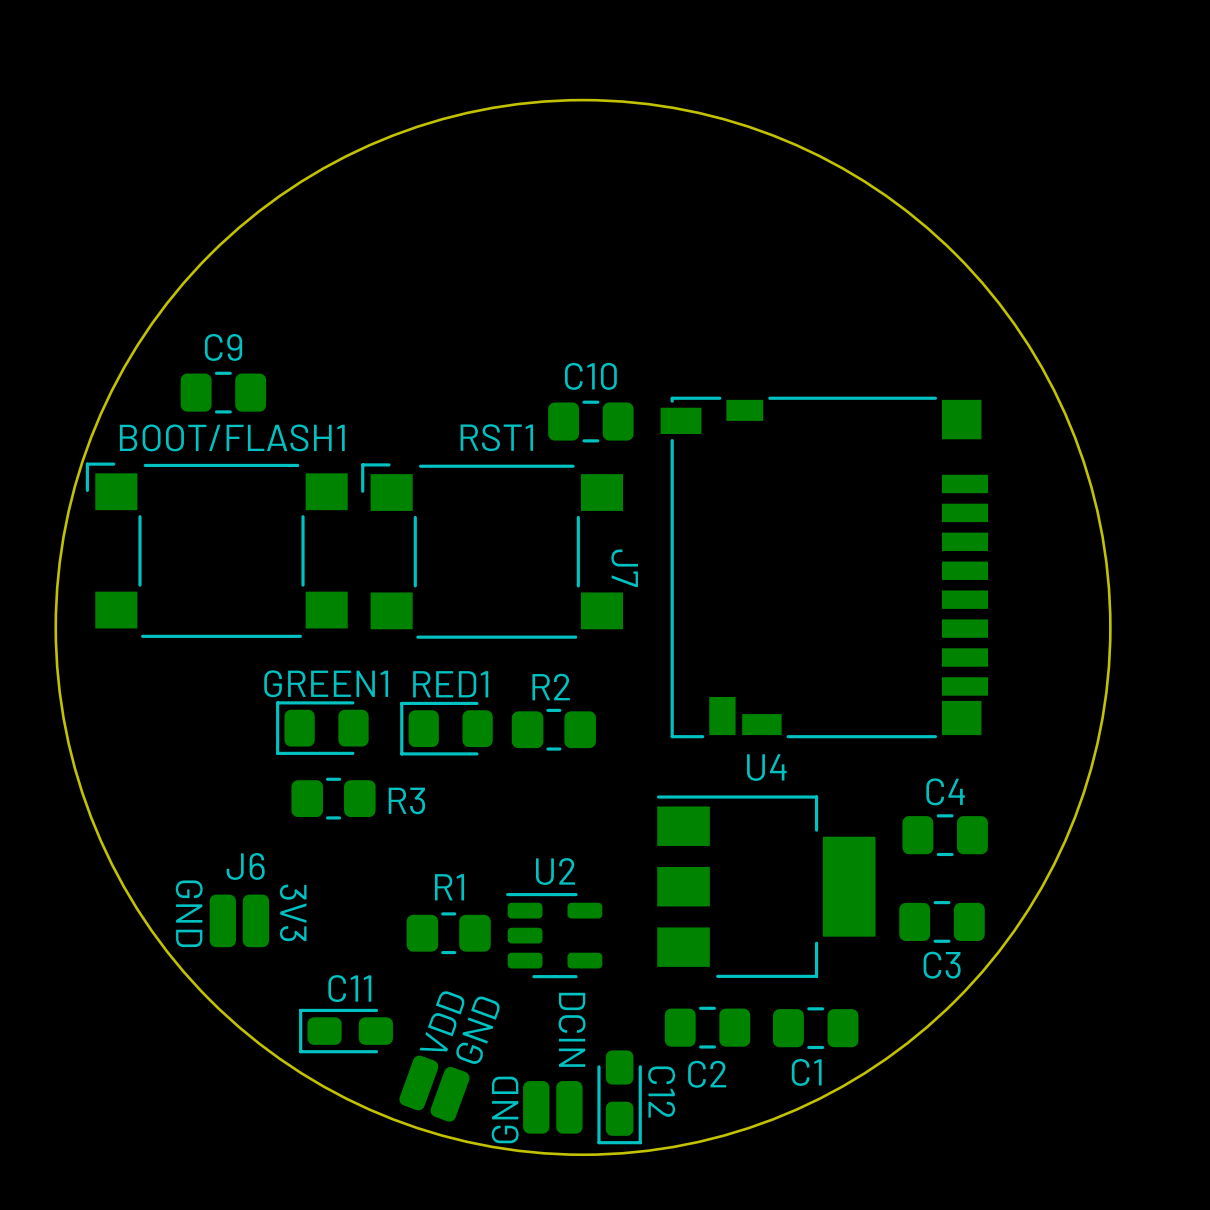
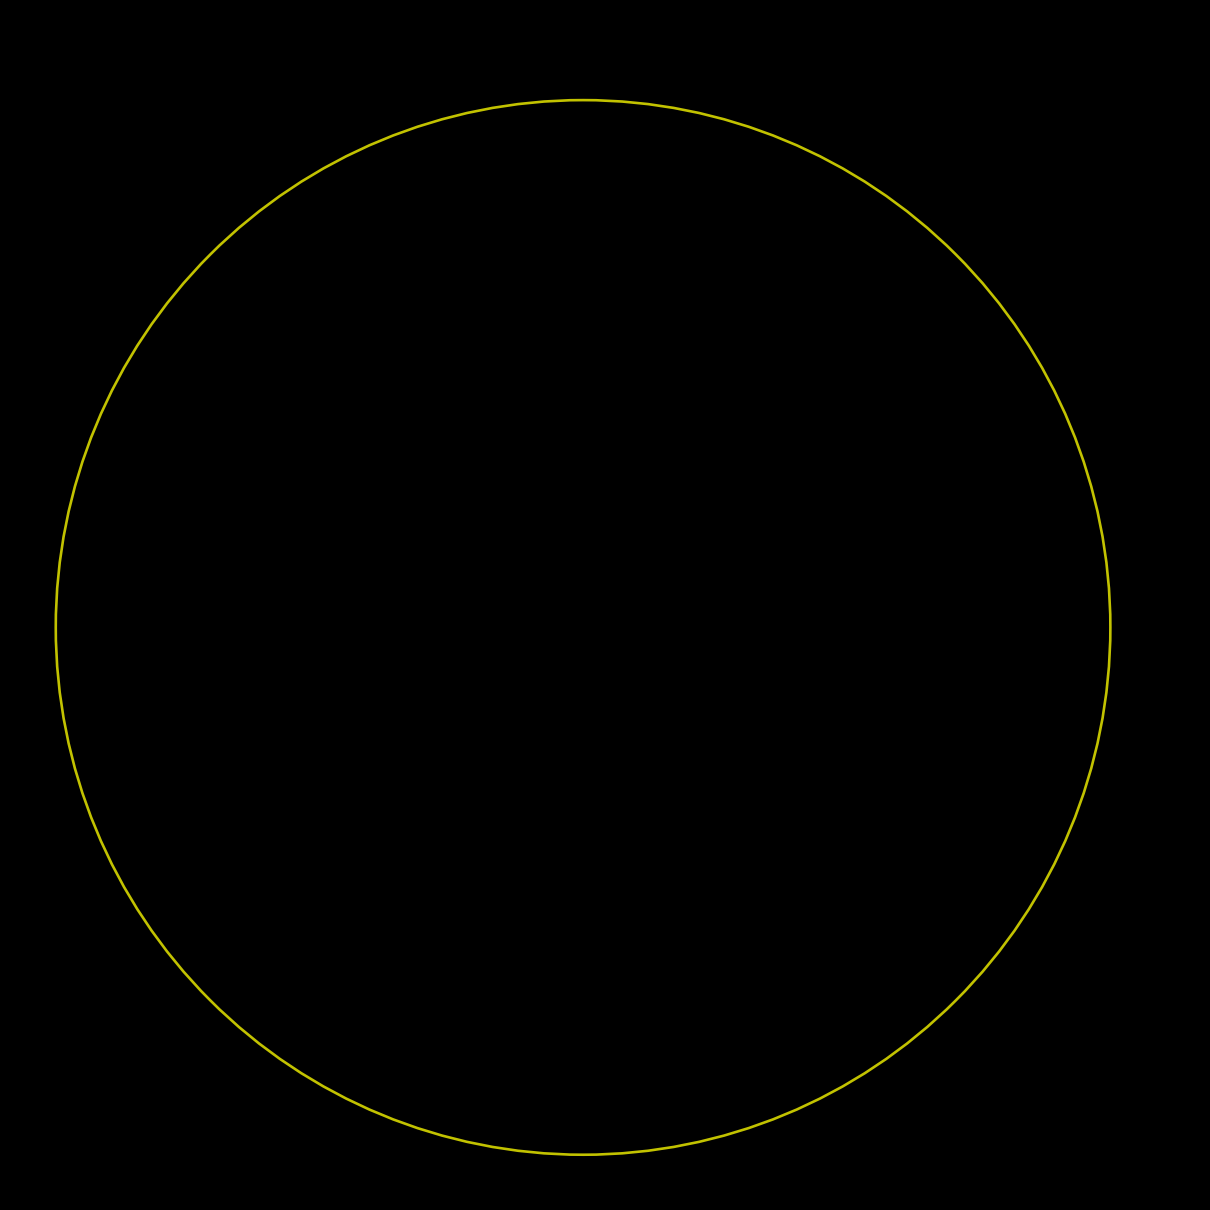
C9: (223, 392) -> none
C10: (590, 421) -> none
BOOT/FLASH1: (216, 550) -> none
RST1: (492, 551) -> none
J7: (824, 567) -> none
GREEN1: (322, 728) -> none
RED1: (446, 728) -> none
R2: (553, 729) -> none
R3: (333, 798) -> none
C4: (945, 835) -> none
U4: (766, 886) -> none
text: 3V3 (293, 912) -> none
text: GND (189, 913) -> none
J6: (239, 920) -> none
C3: (942, 921) -> none
R1: (448, 933) -> none
U2: (554, 935) -> none
text: VDD (442, 1020) -> none
C2: (707, 1027) -> none
C1: (815, 1028) -> none
text: DCIN (572, 1029) -> none
text: GND (478, 1030) -> none
C11: (346, 1031) -> none
part: (434, 1088) -> none
C12: (619, 1097) -> none
part: (552, 1107) -> none
text: GND (505, 1109) -> none

